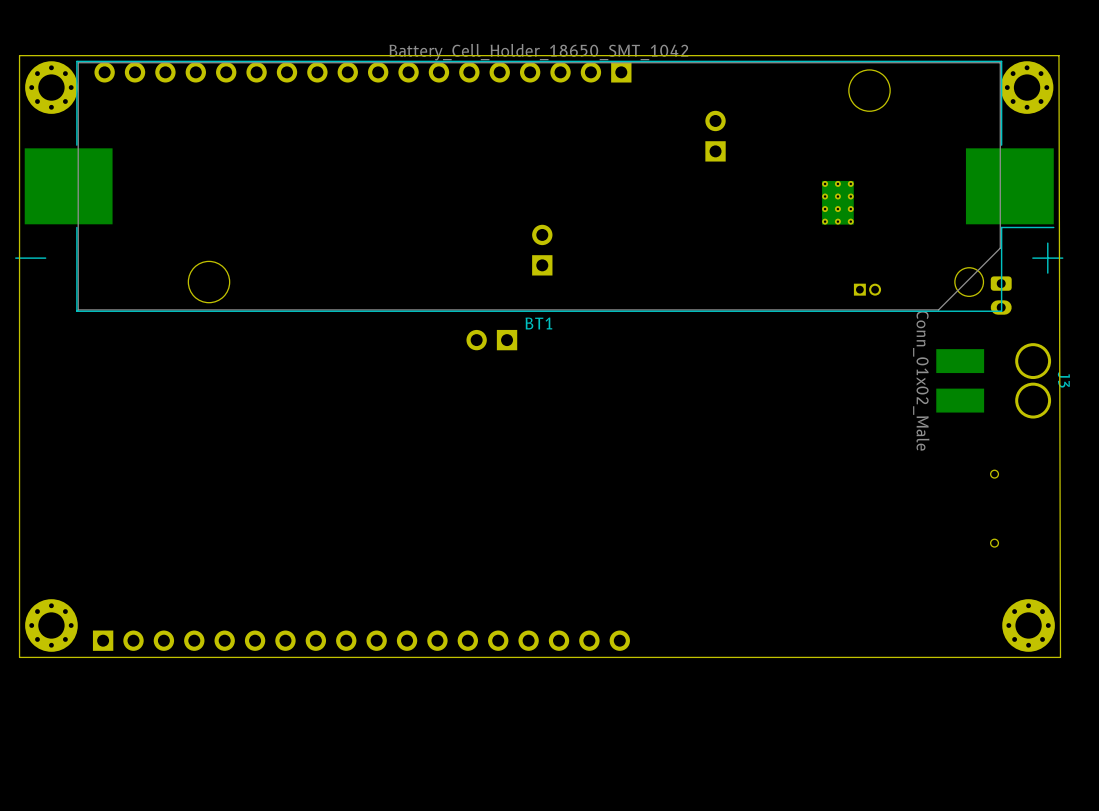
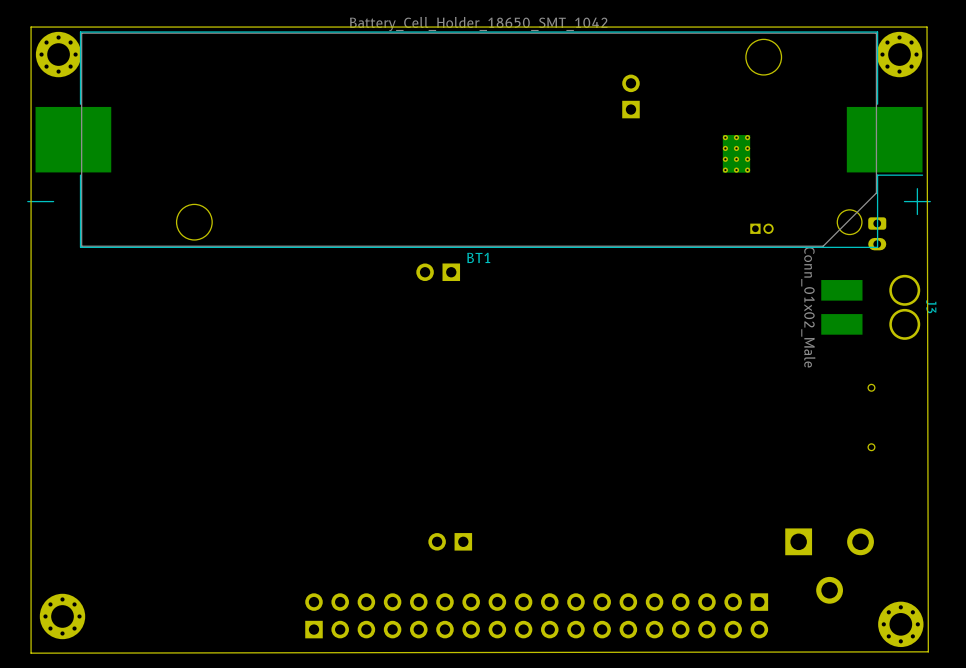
board edge: (1058, 55) (1060, 657) (19, 657) -> (927, 27) (928, 651) (31, 653) (31, 545)
part: (362, 72) -> none
part: (542, 250) -> none
part position: (51, 625) -> (62, 616)
part position: (1028, 625) -> (900, 624)
part: (361, 640) -> none
part: none -> (450, 541)
part: none -> (829, 566)
part: none -> (536, 602)
part: none -> (536, 629)

